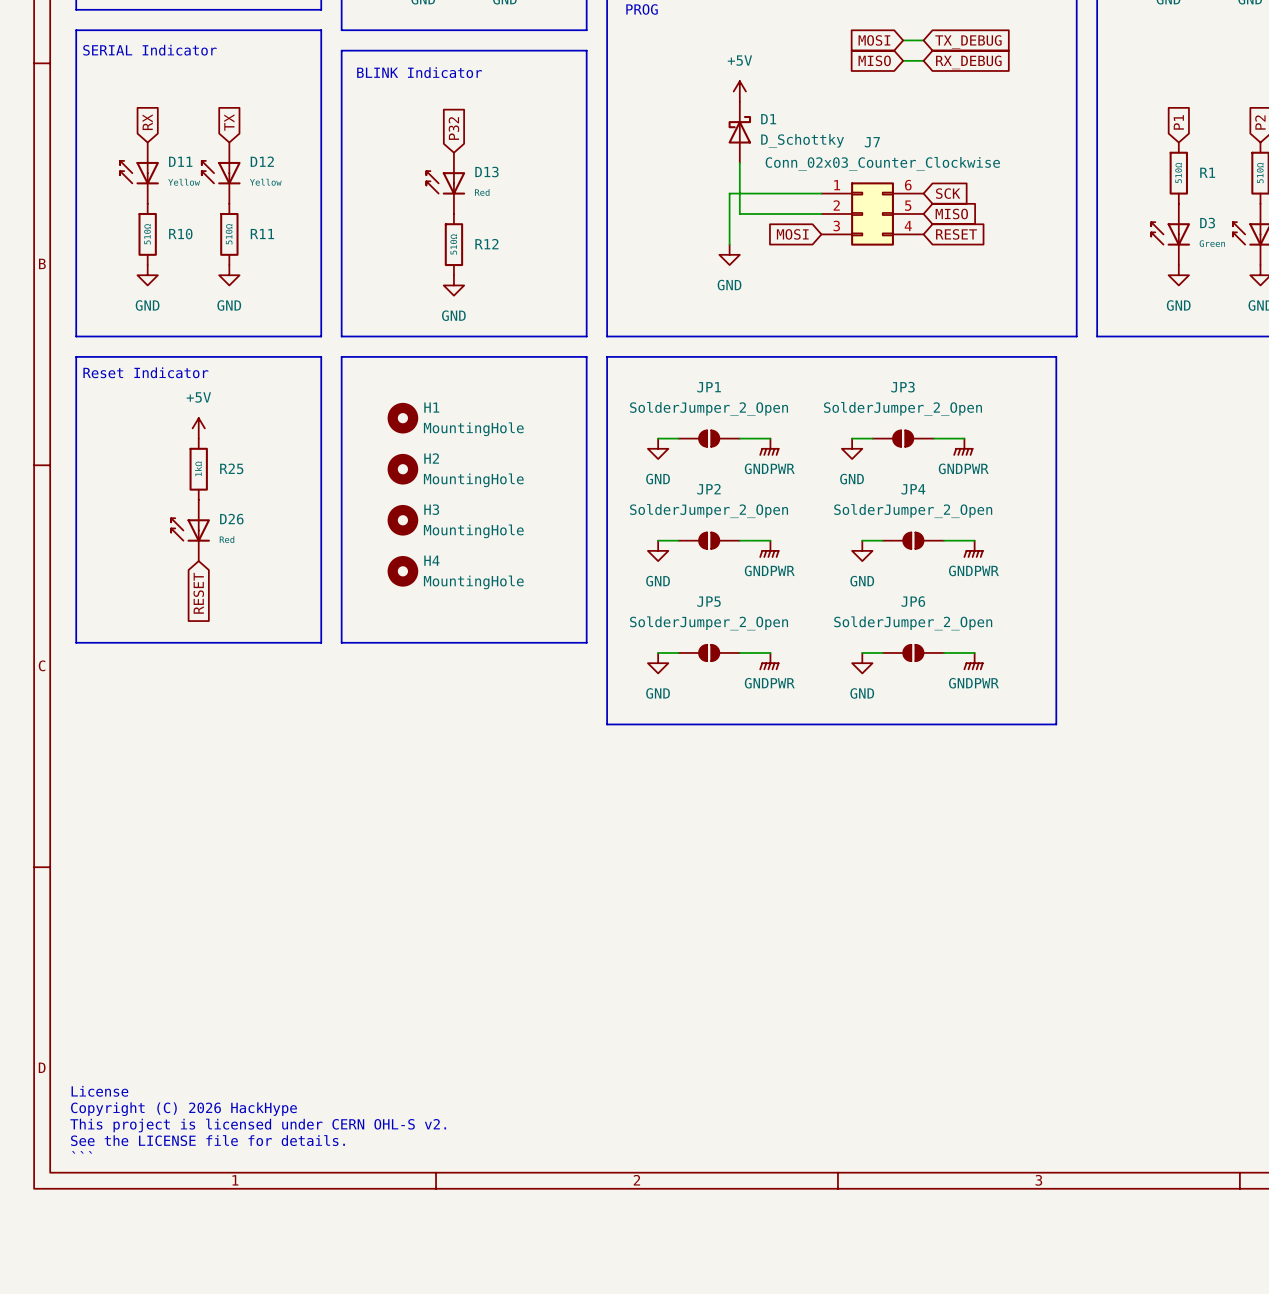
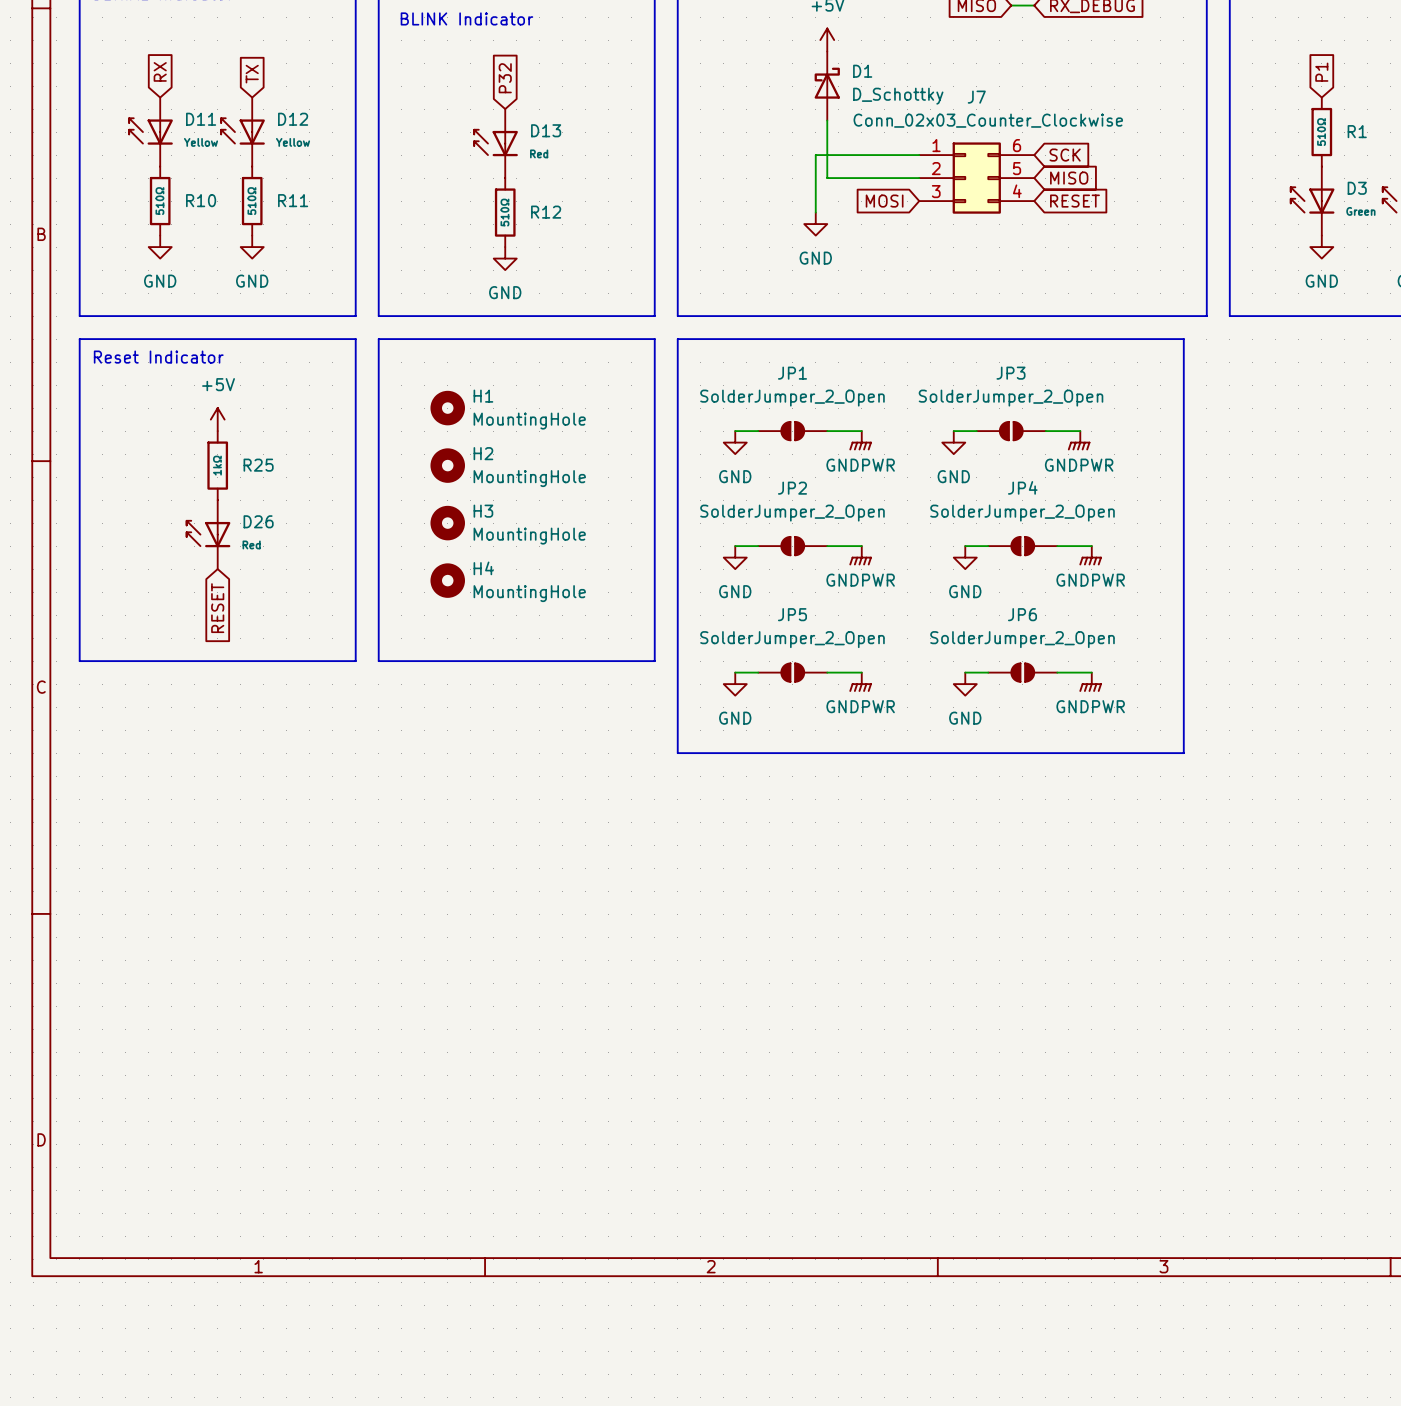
text: License (99, 1091) -> none
text: Copyright (C) 2026 HackHype (183, 1109) -> none
text: This project is licensed under CERN OHL-S v2. (258, 1125) -> none
text: See the LICENSE file for details. (207, 1140) -> none
text: ``` (82, 1152) -> none

